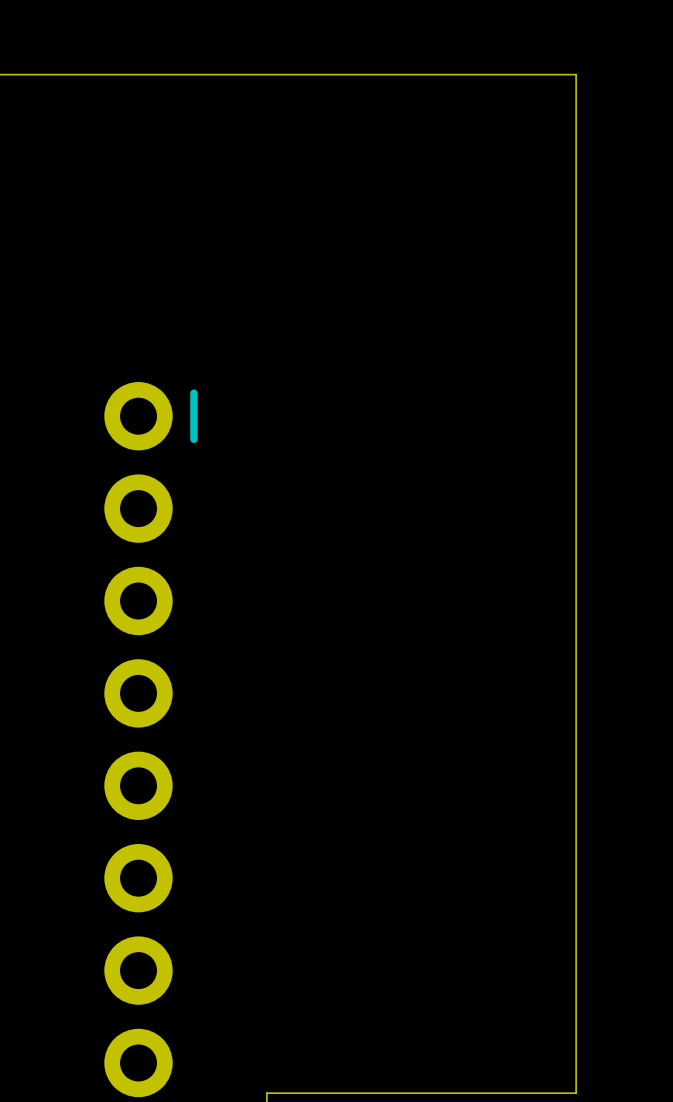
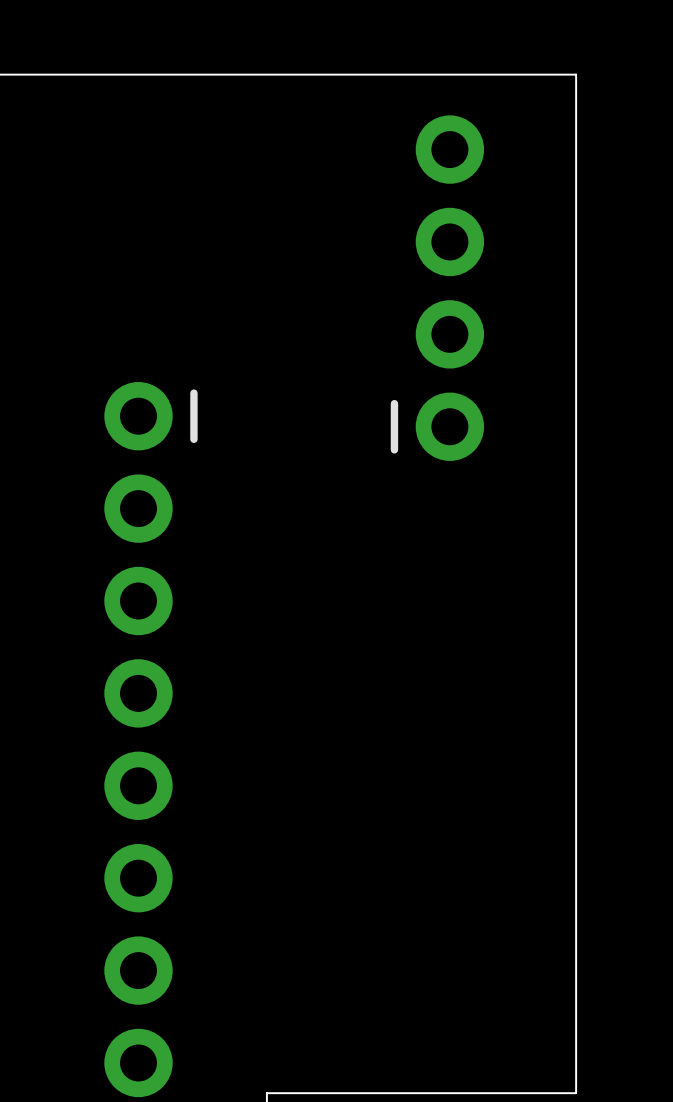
part: none -> (437, 288)

